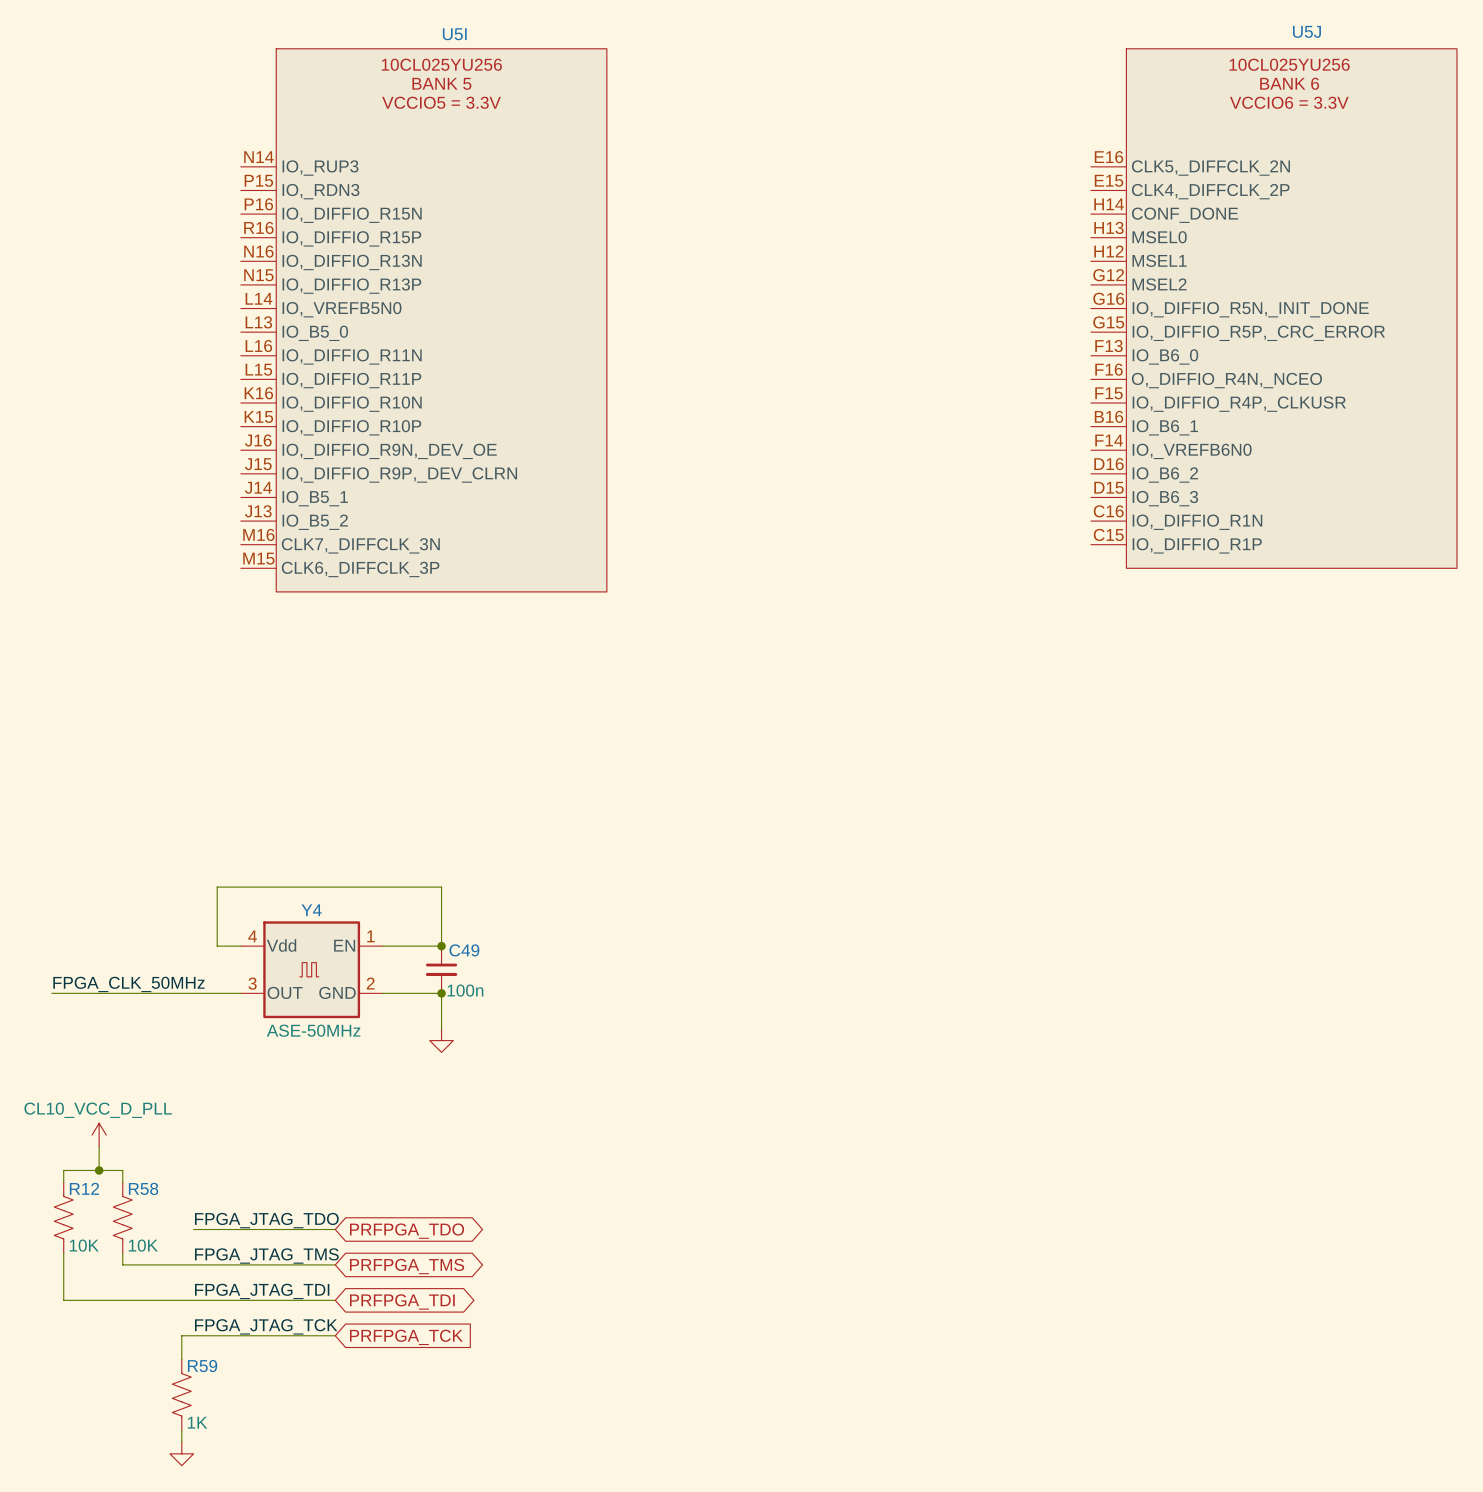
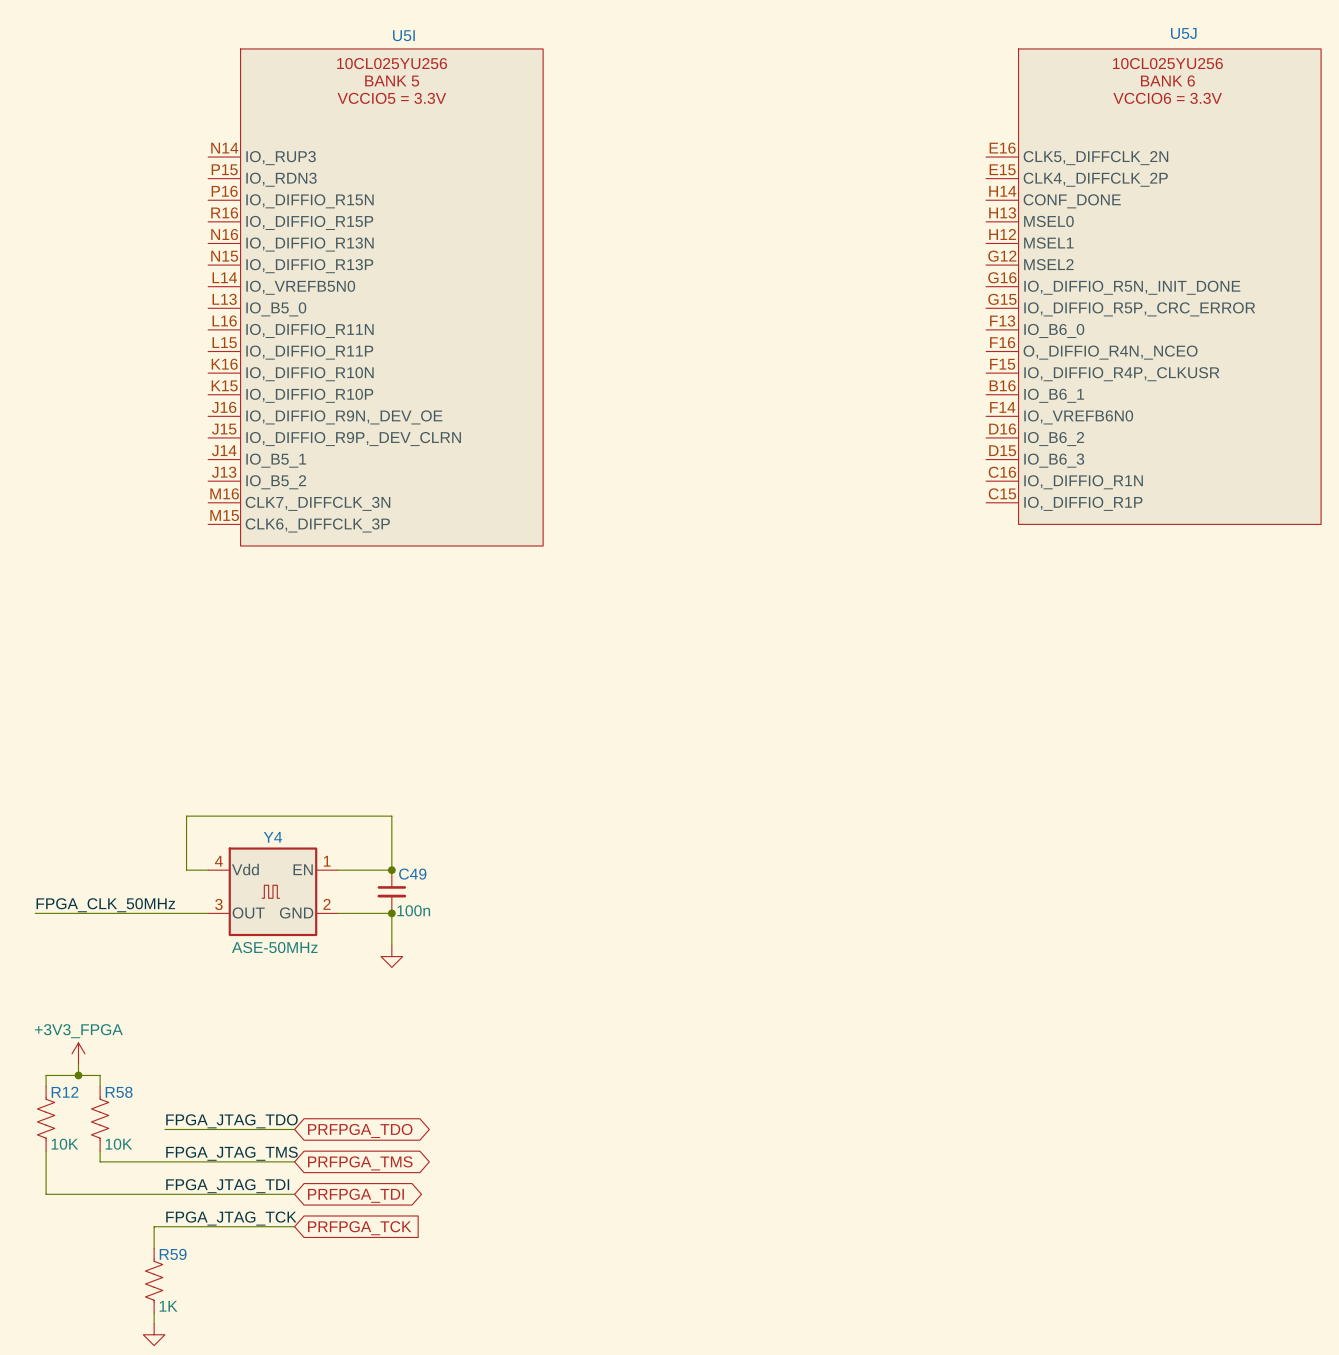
power symbol: CL10_VCC_D_PLL (99, 1135) -> none
power symbol: none -> +3V3_FPGA (78, 1053)

